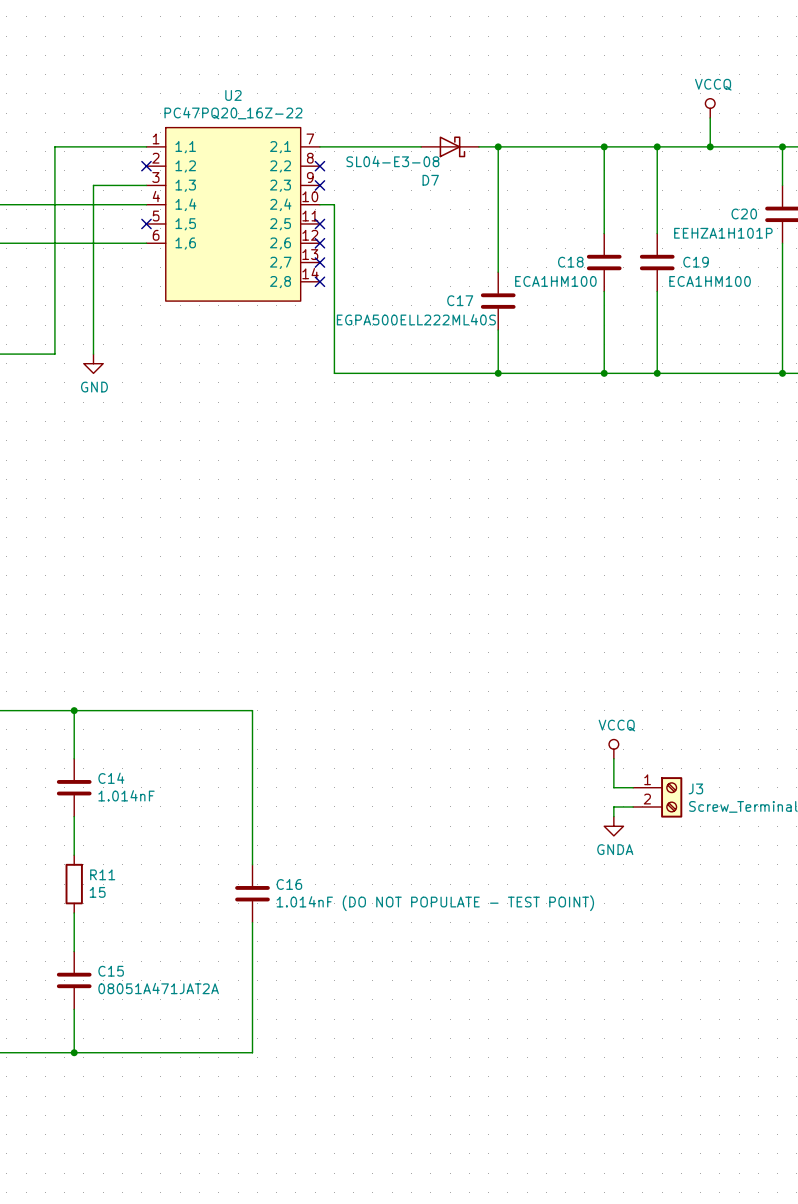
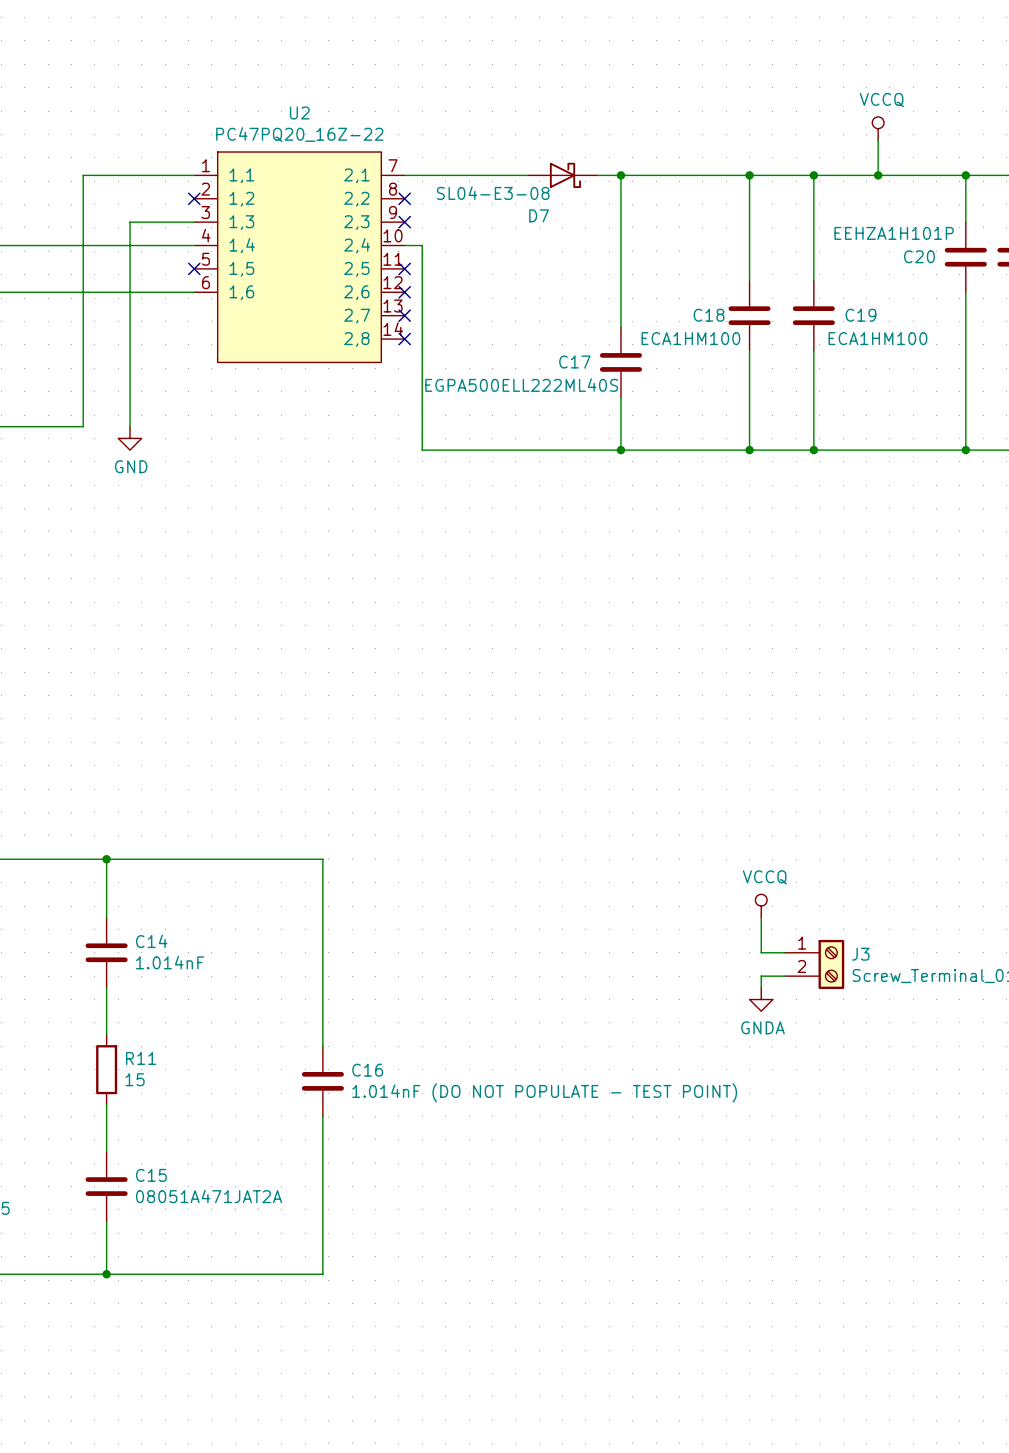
C20 value position: EEHZA1H101P (723, 233) -> EEHZA1H101P (894, 233)

